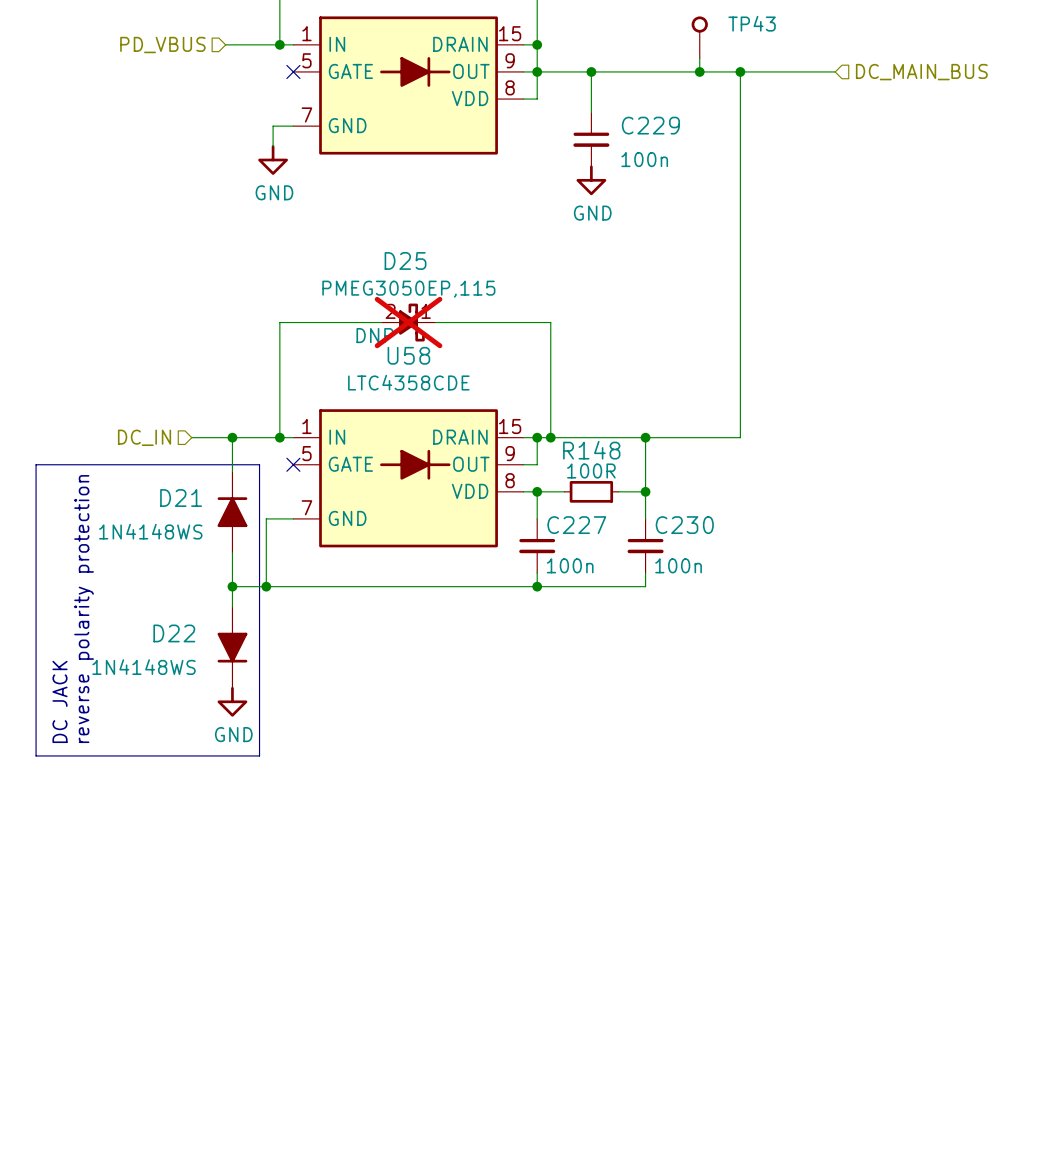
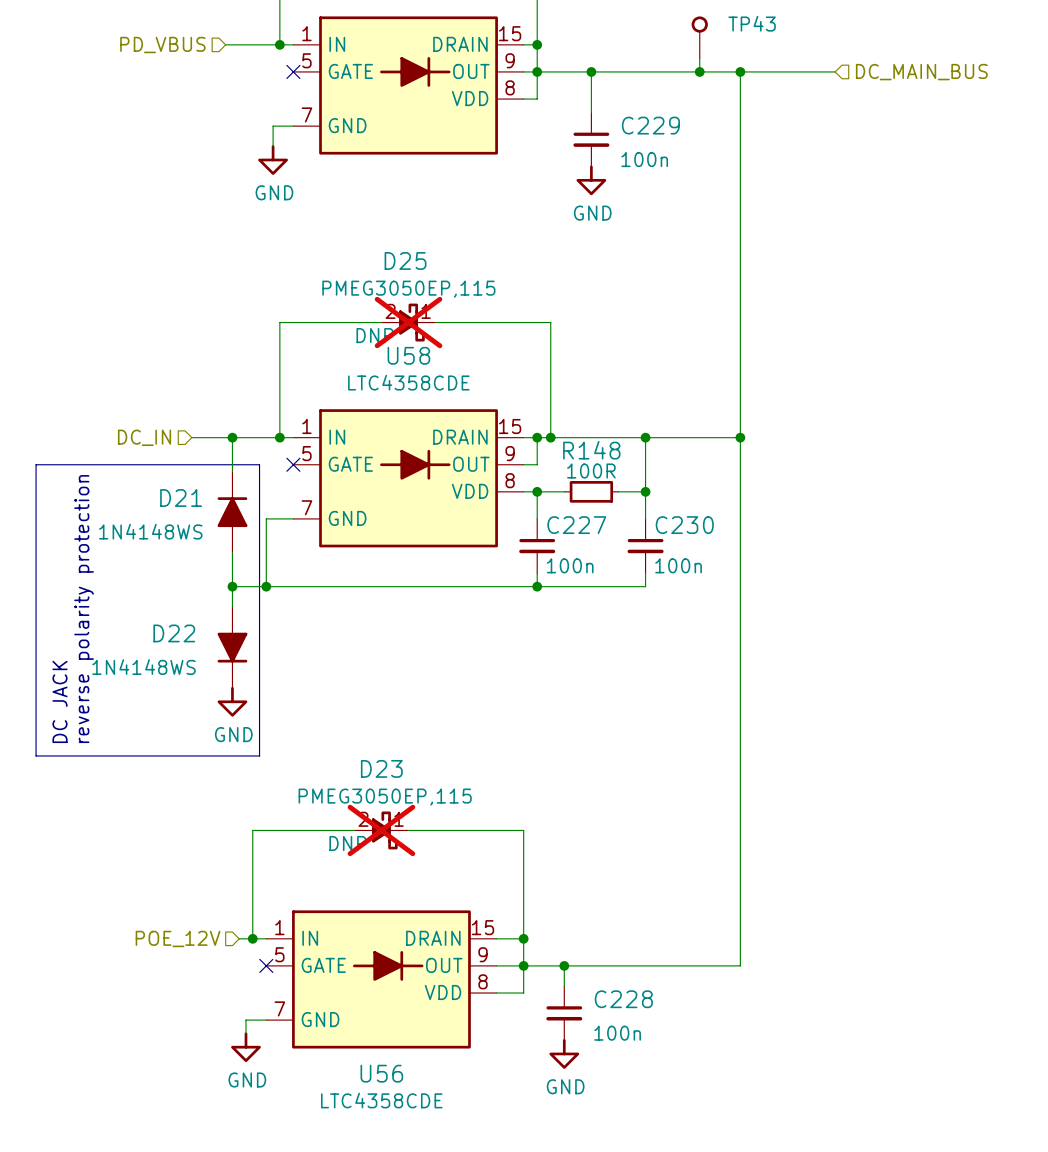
wire: none -> (740, 437) (740, 965) (496, 965)
junction: none -> (740, 437)
wire: none -> (354, 830) (252, 830) (252, 938)
D23: none -> (381, 830)
wire: none -> (408, 830) (523, 830) (523, 993) (496, 993)
hierarchical label: none -> POE_12V (178, 938)
wire: none -> (239, 938) (266, 938)
junction: none -> (252, 938)
wire: none -> (496, 938) (523, 938)
junction: none -> (523, 938)
no-connect mark: none -> (266, 965)
junction: none -> (523, 965)
wire: none -> (564, 965) (564, 986)
junction: none -> (564, 965)
U56: none -> LTC4358CDE (381, 979)
C228: none -> (564, 1013)
wire: none -> (266, 1020) (245, 1020) (245, 1033)
power symbol: none -> GND (245, 1047)
power symbol: none -> GND (564, 1053)

